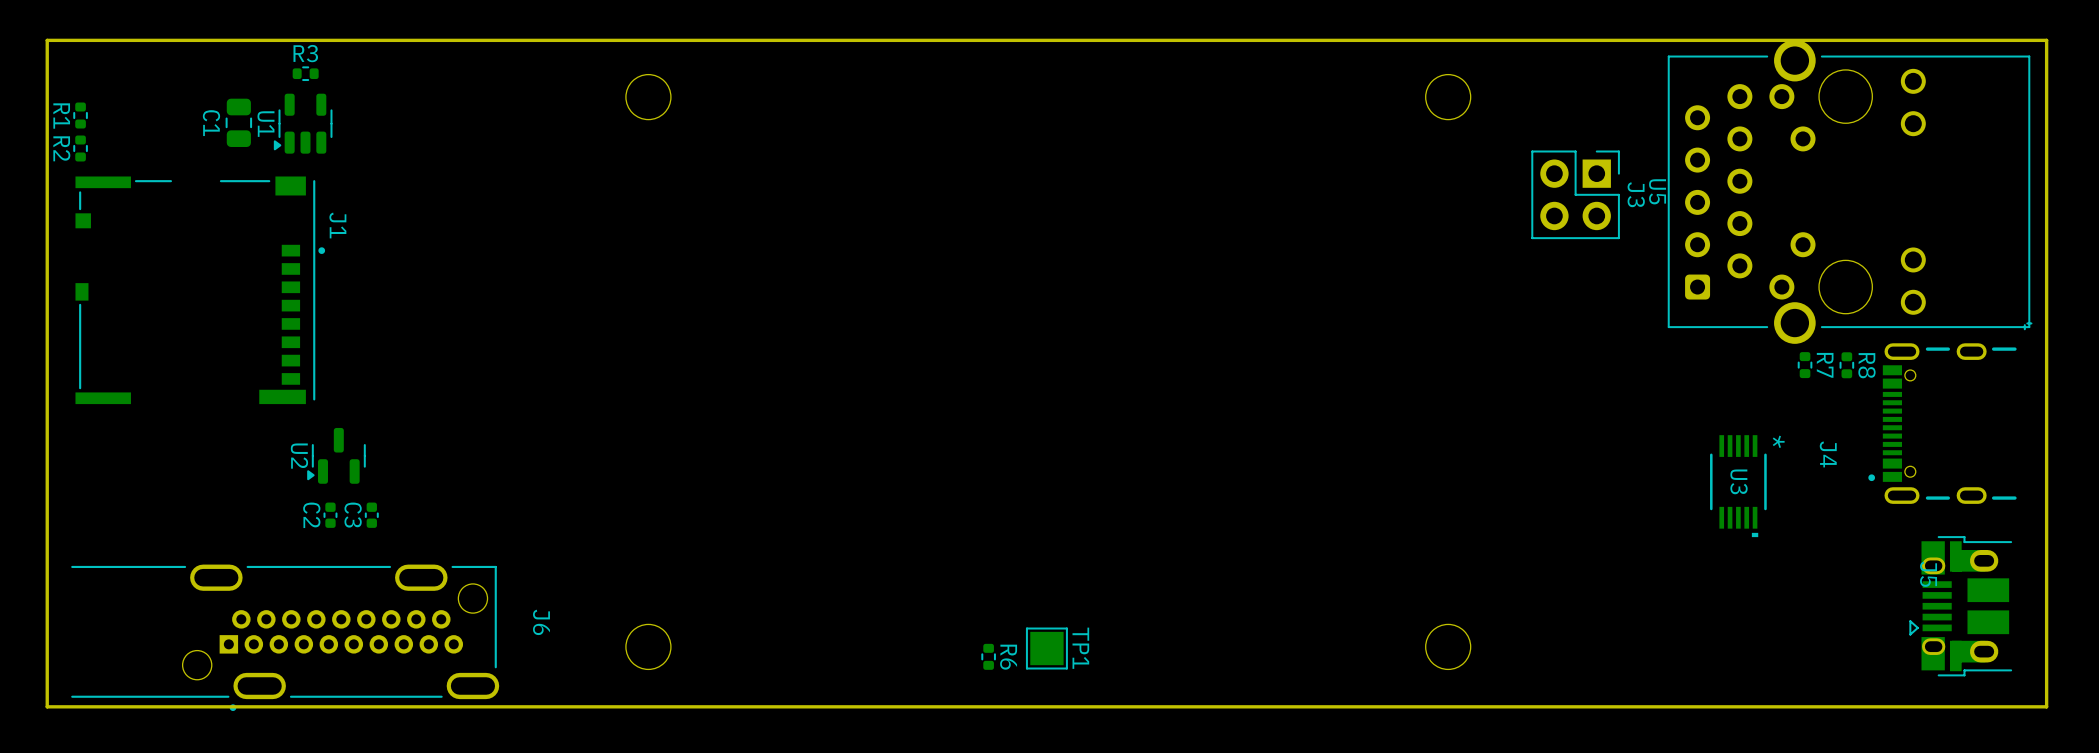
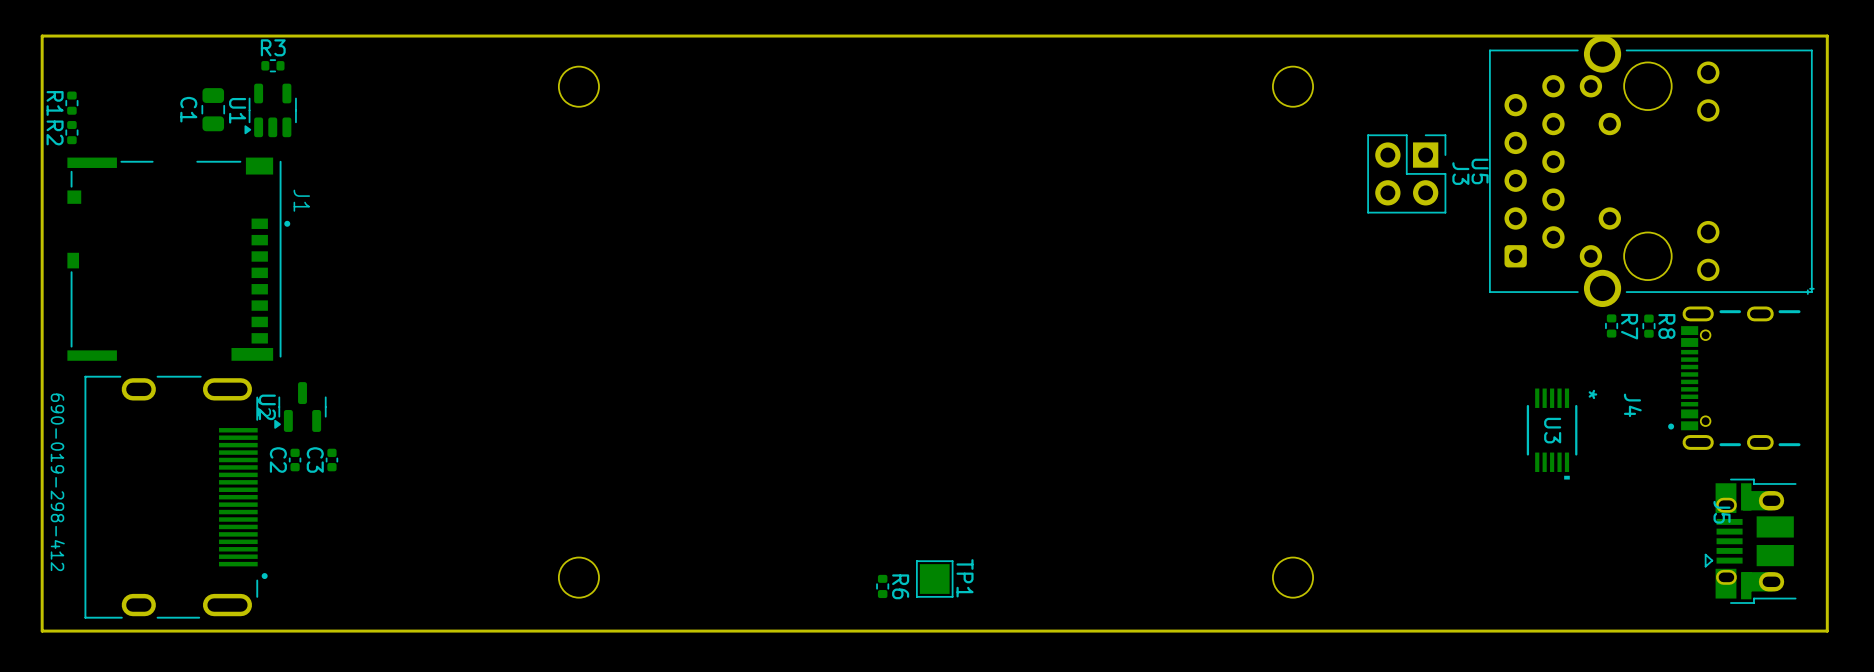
part: none -> 690-019-298-412 (176, 497)
J6: (285, 637) -> none

